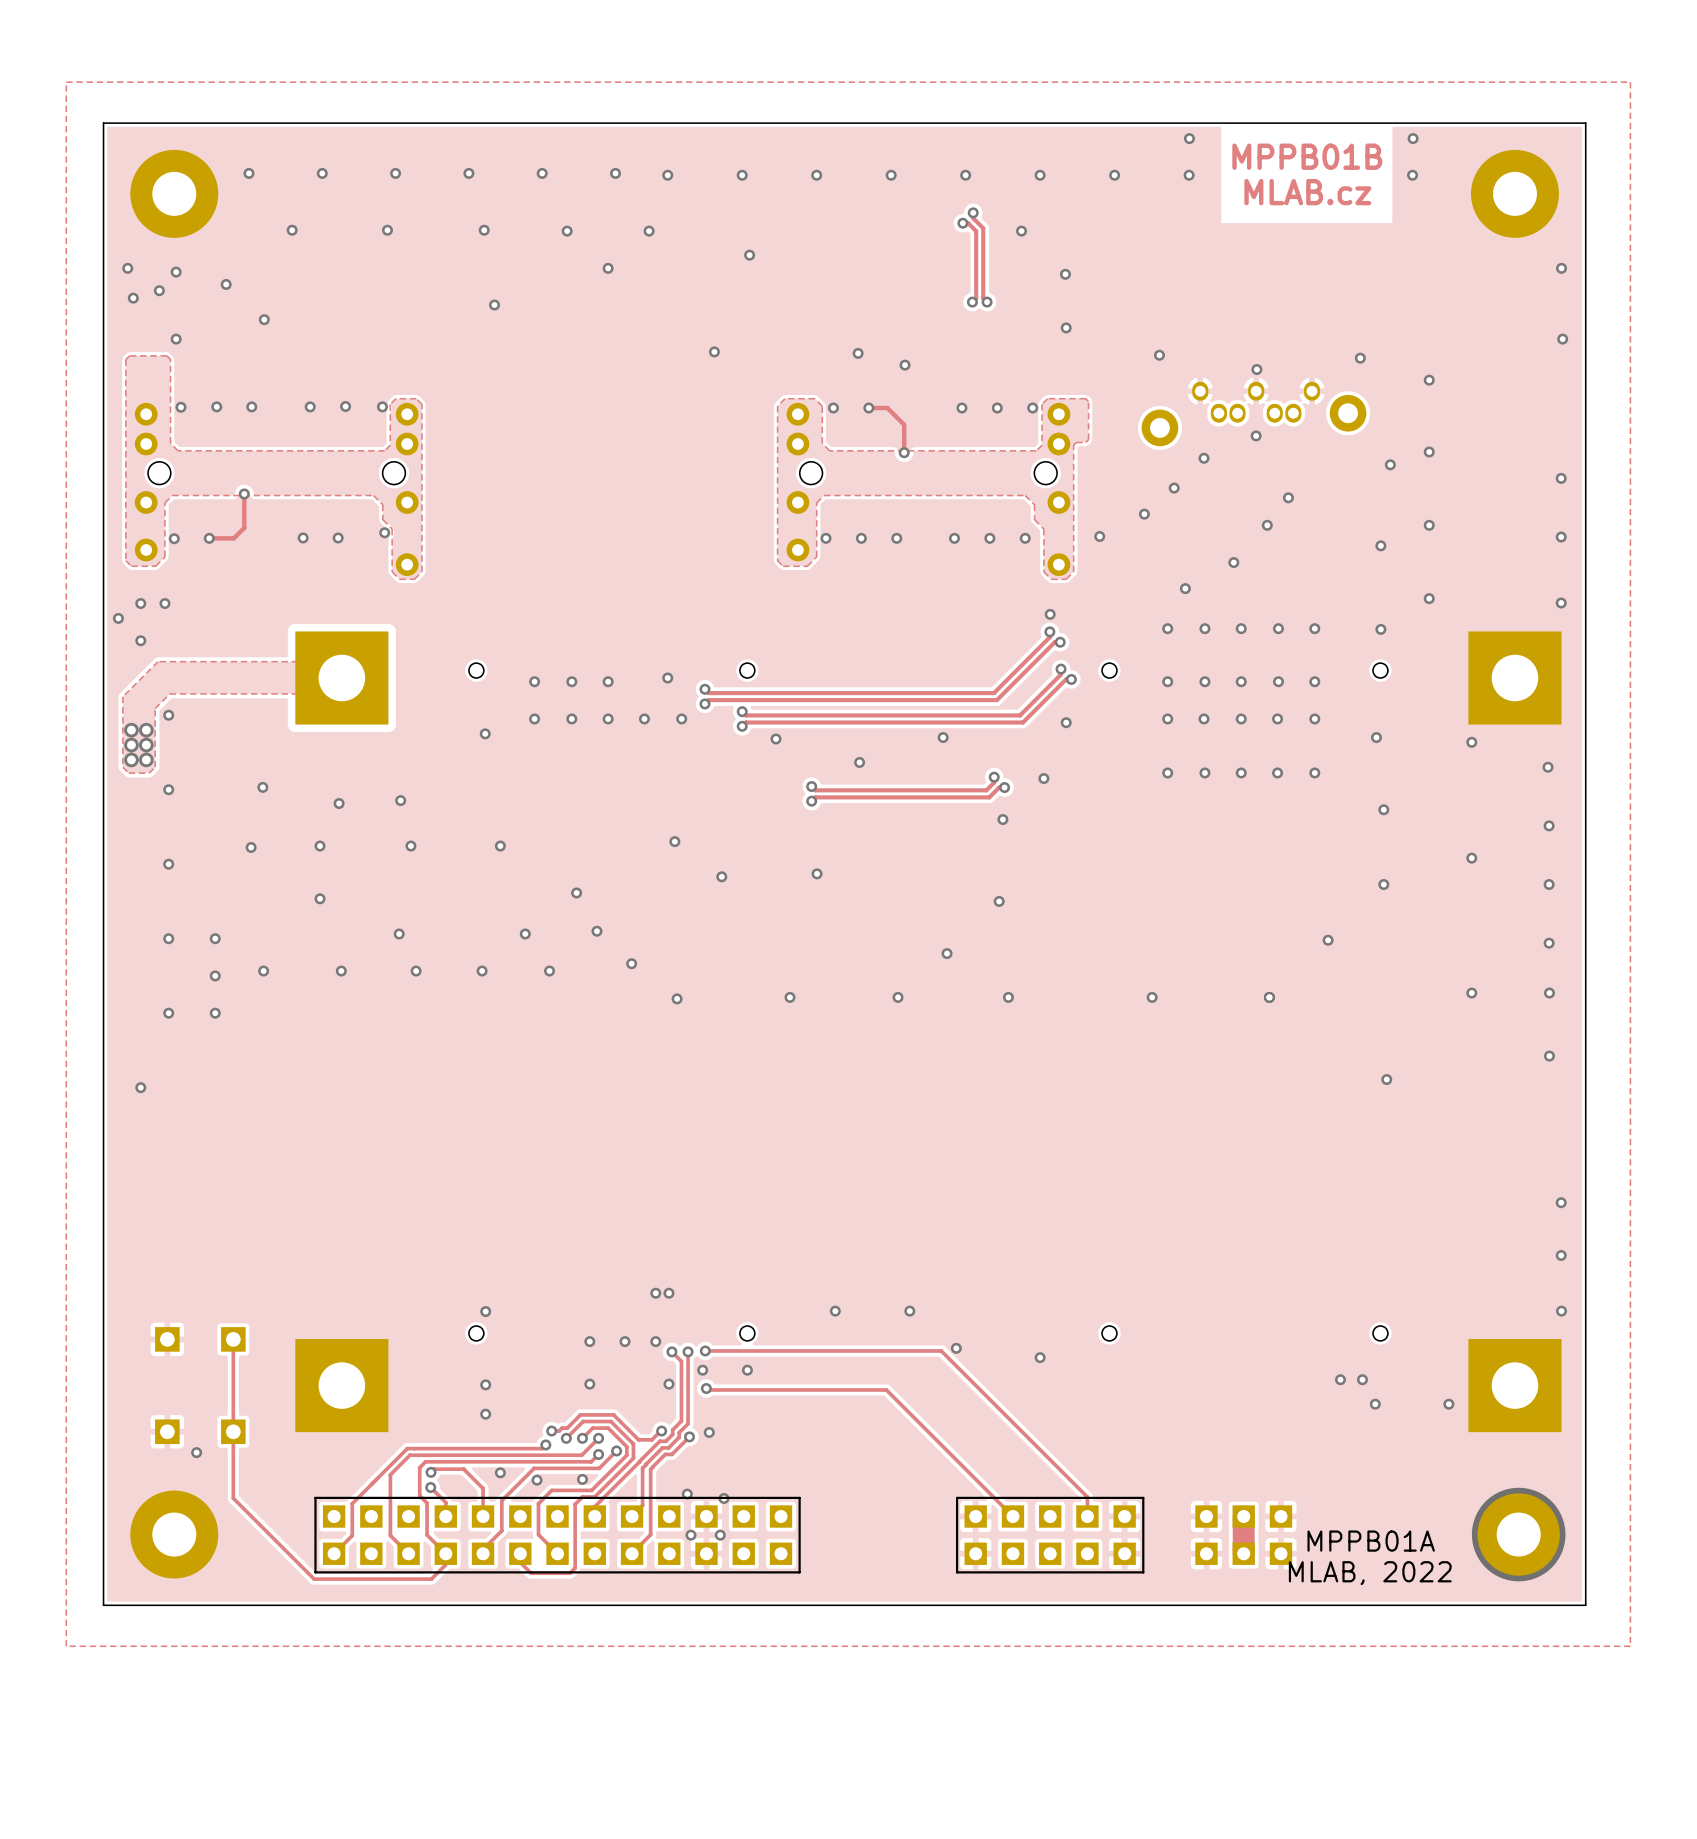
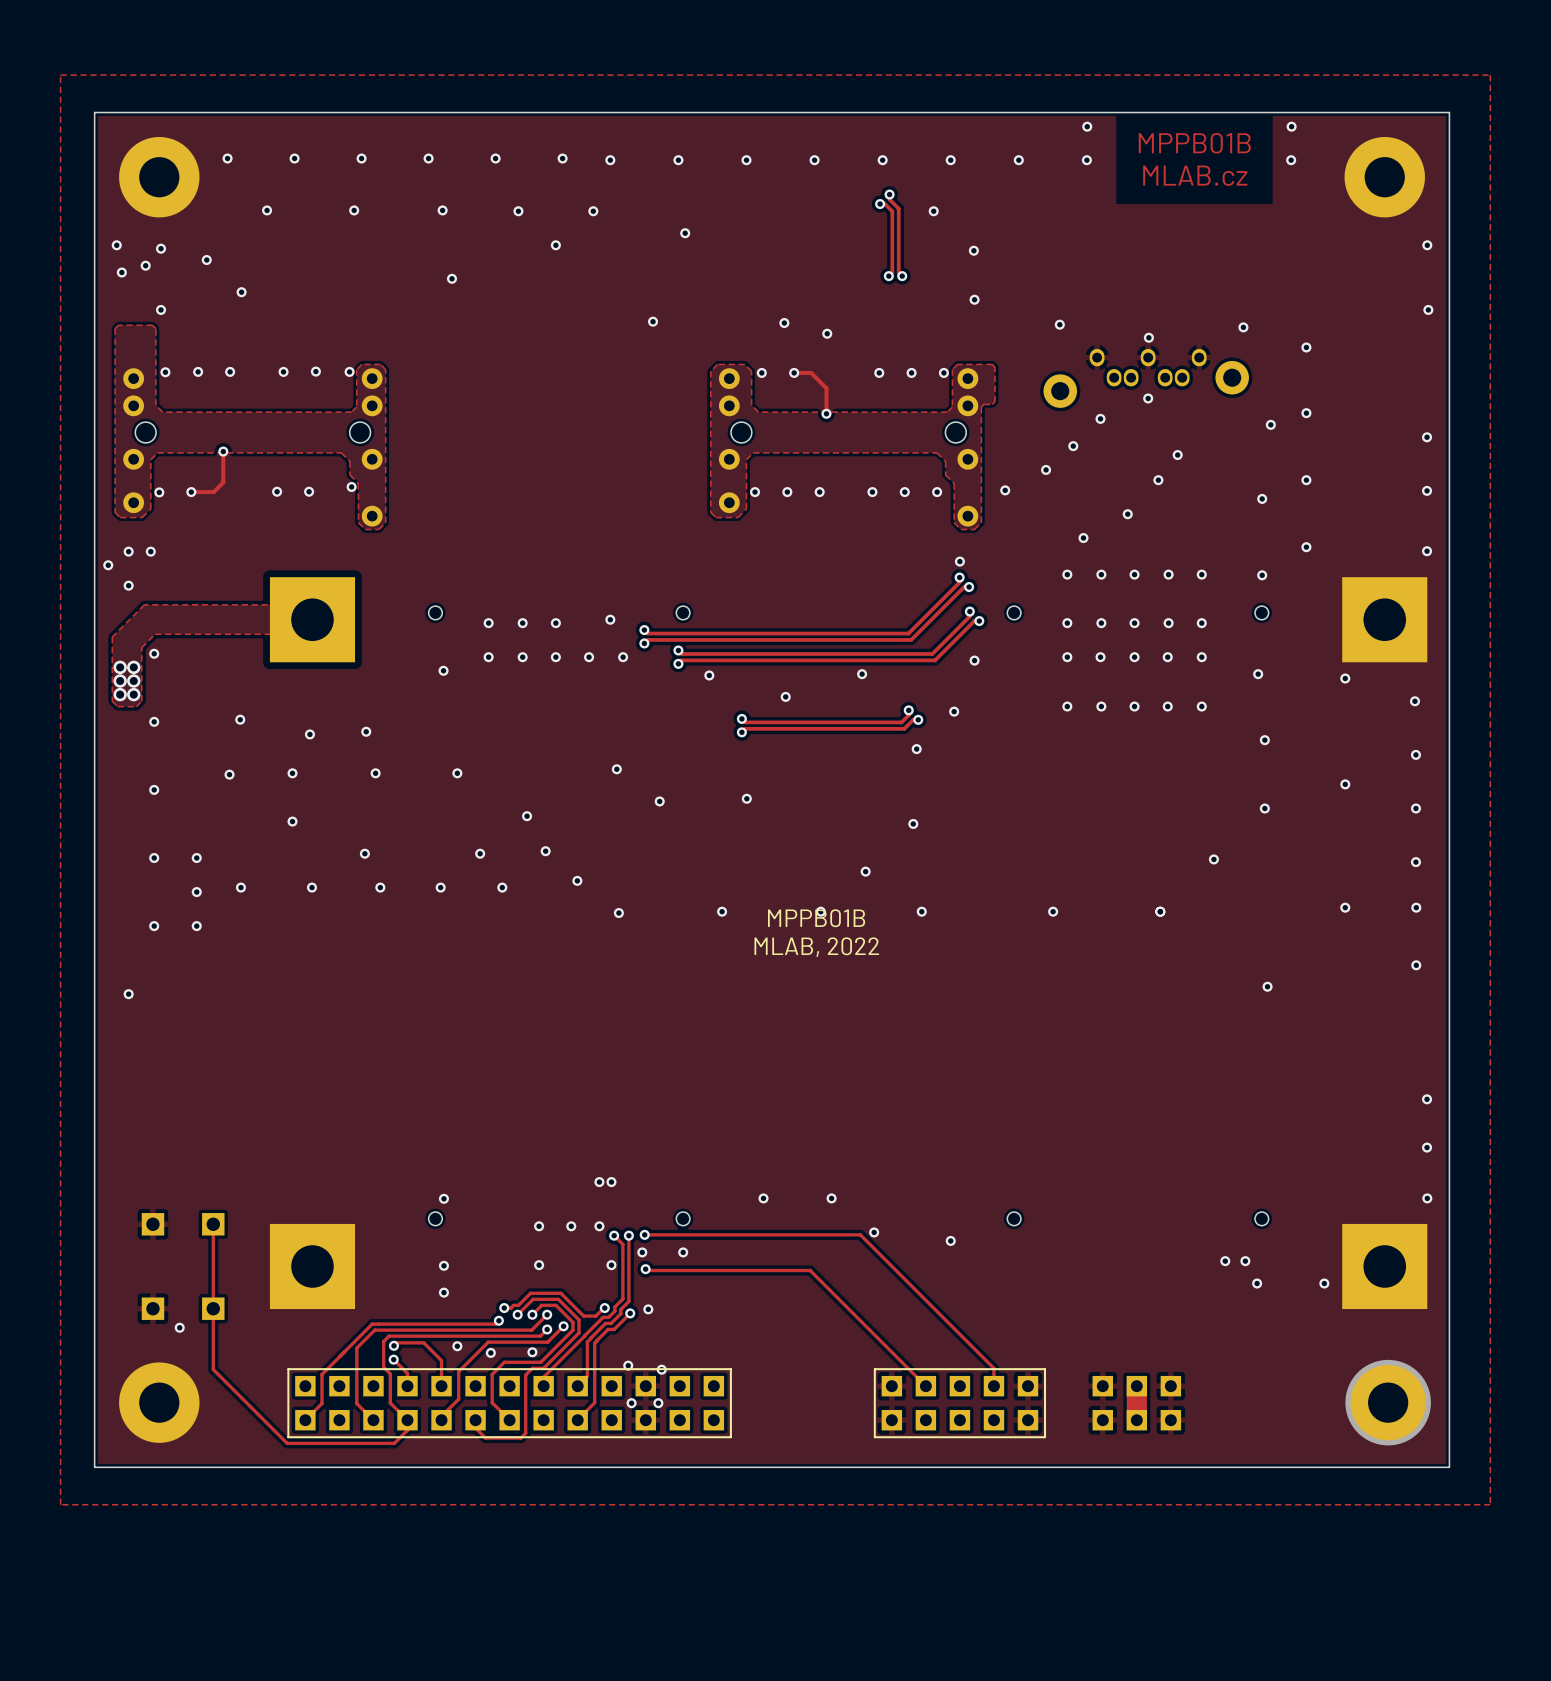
text: none -> MPPB01B (816, 918)
text: none -> MLAB, 2022 (816, 947)
text: MPPB01A (1371, 1541) -> none
text: MLAB, 2022 (1370, 1573) -> none

